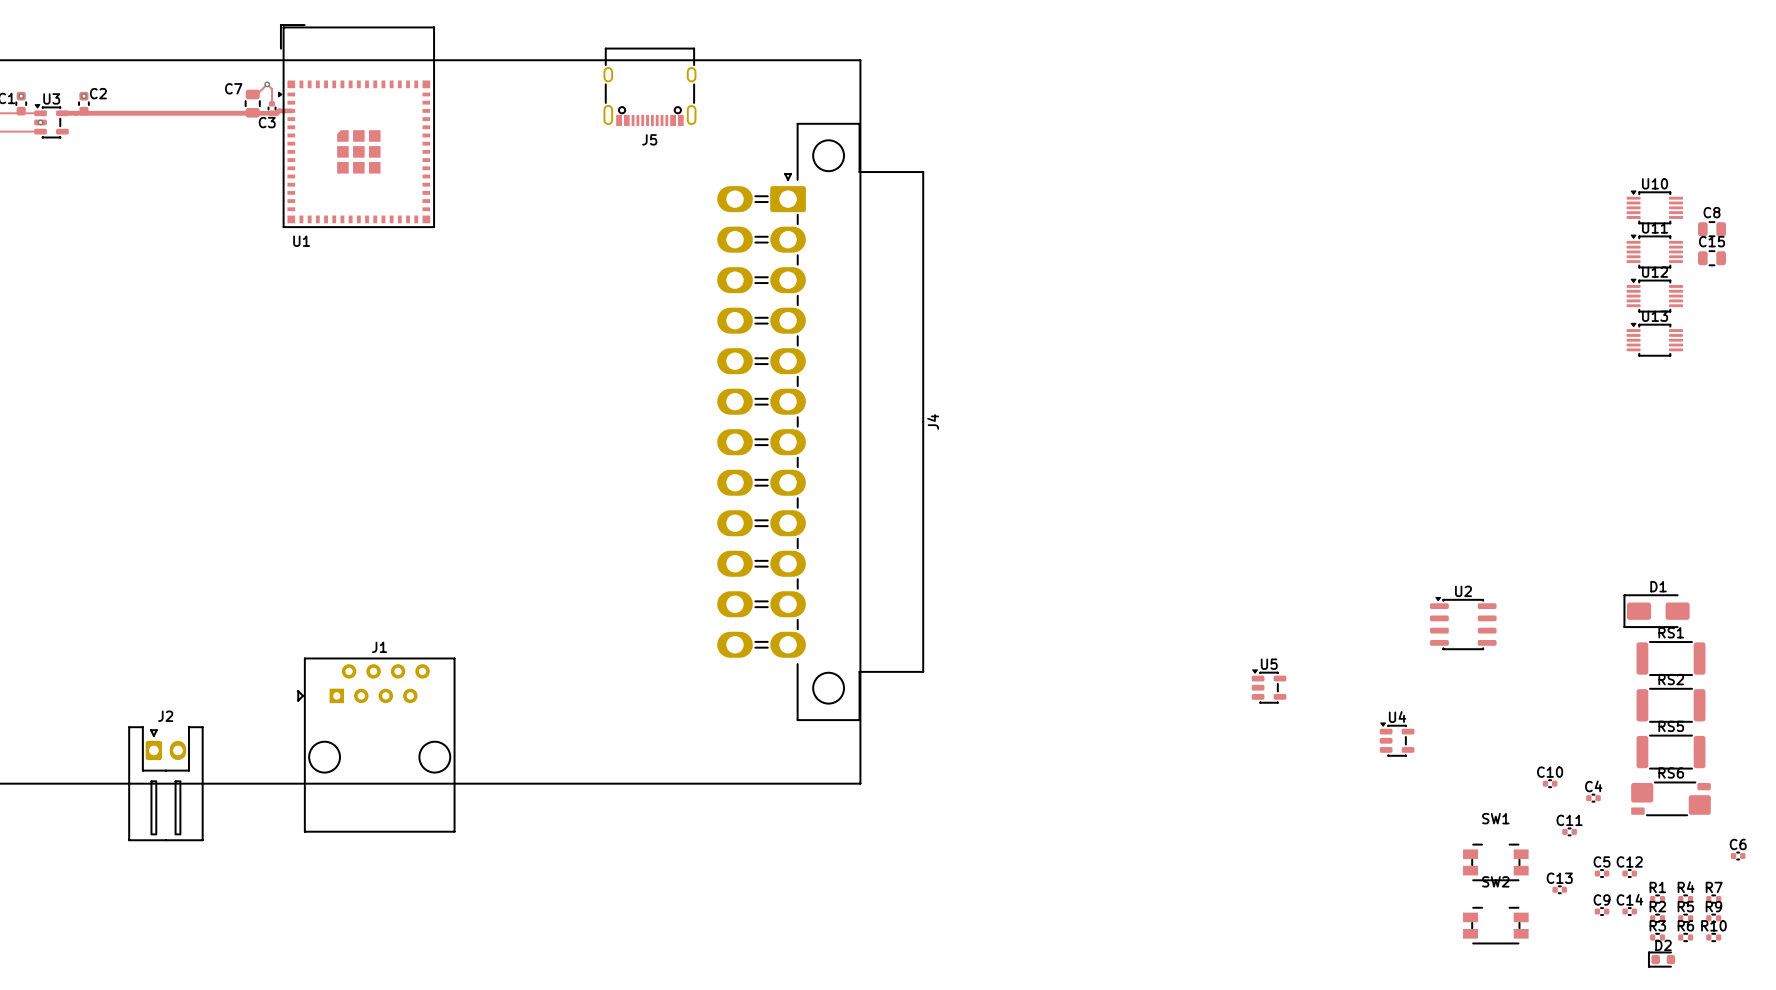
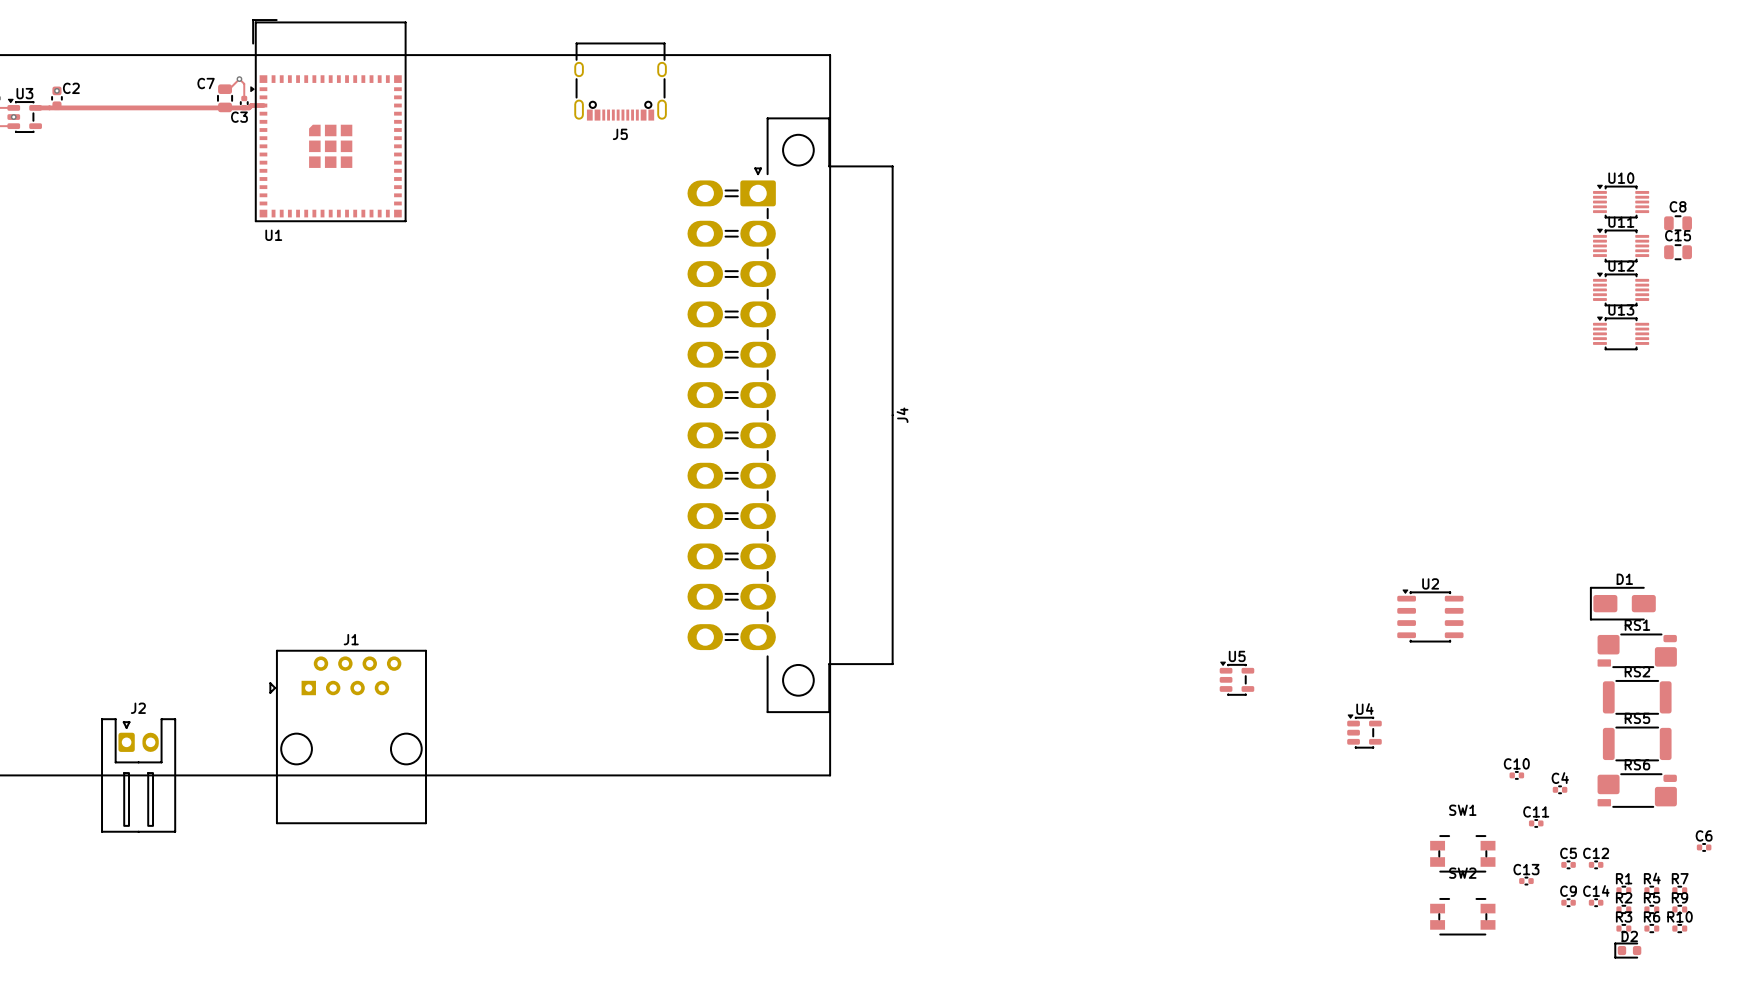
RS1 footprint: [1636, 641, 1706, 676] -> [1597, 633, 1677, 668]

